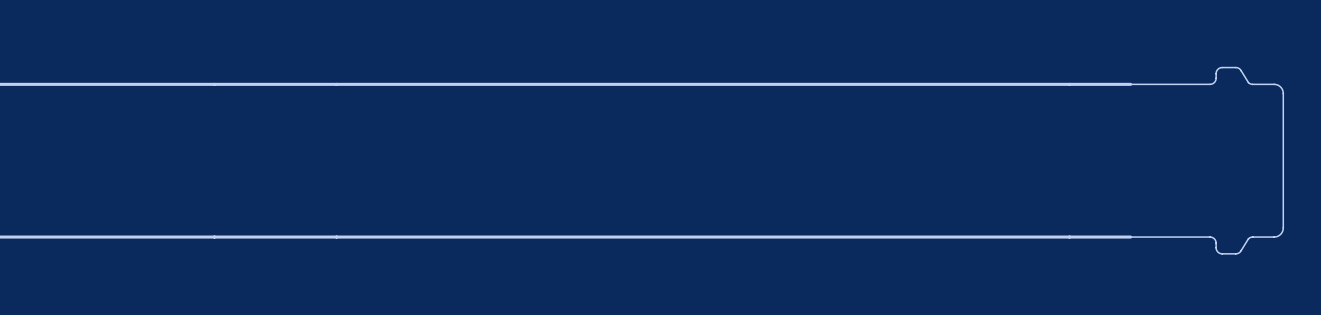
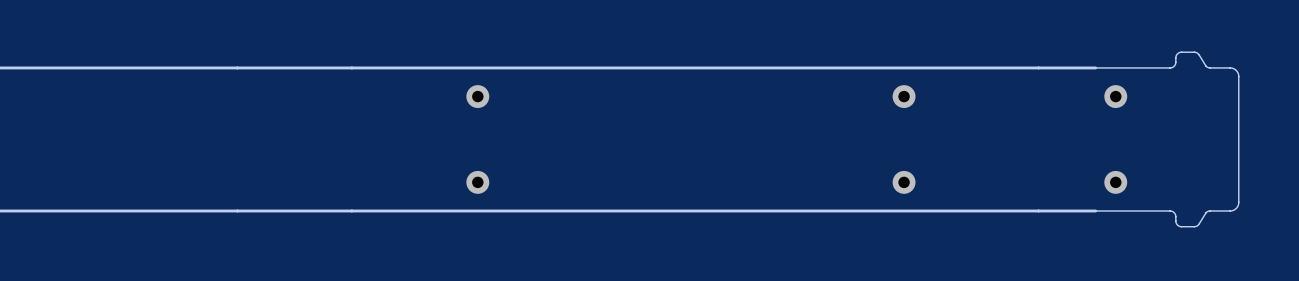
via: none -> (477, 96)
via: none -> (904, 96)
via: none -> (1115, 96)
via: none -> (477, 182)
via: none -> (904, 182)
via: none -> (1115, 182)

